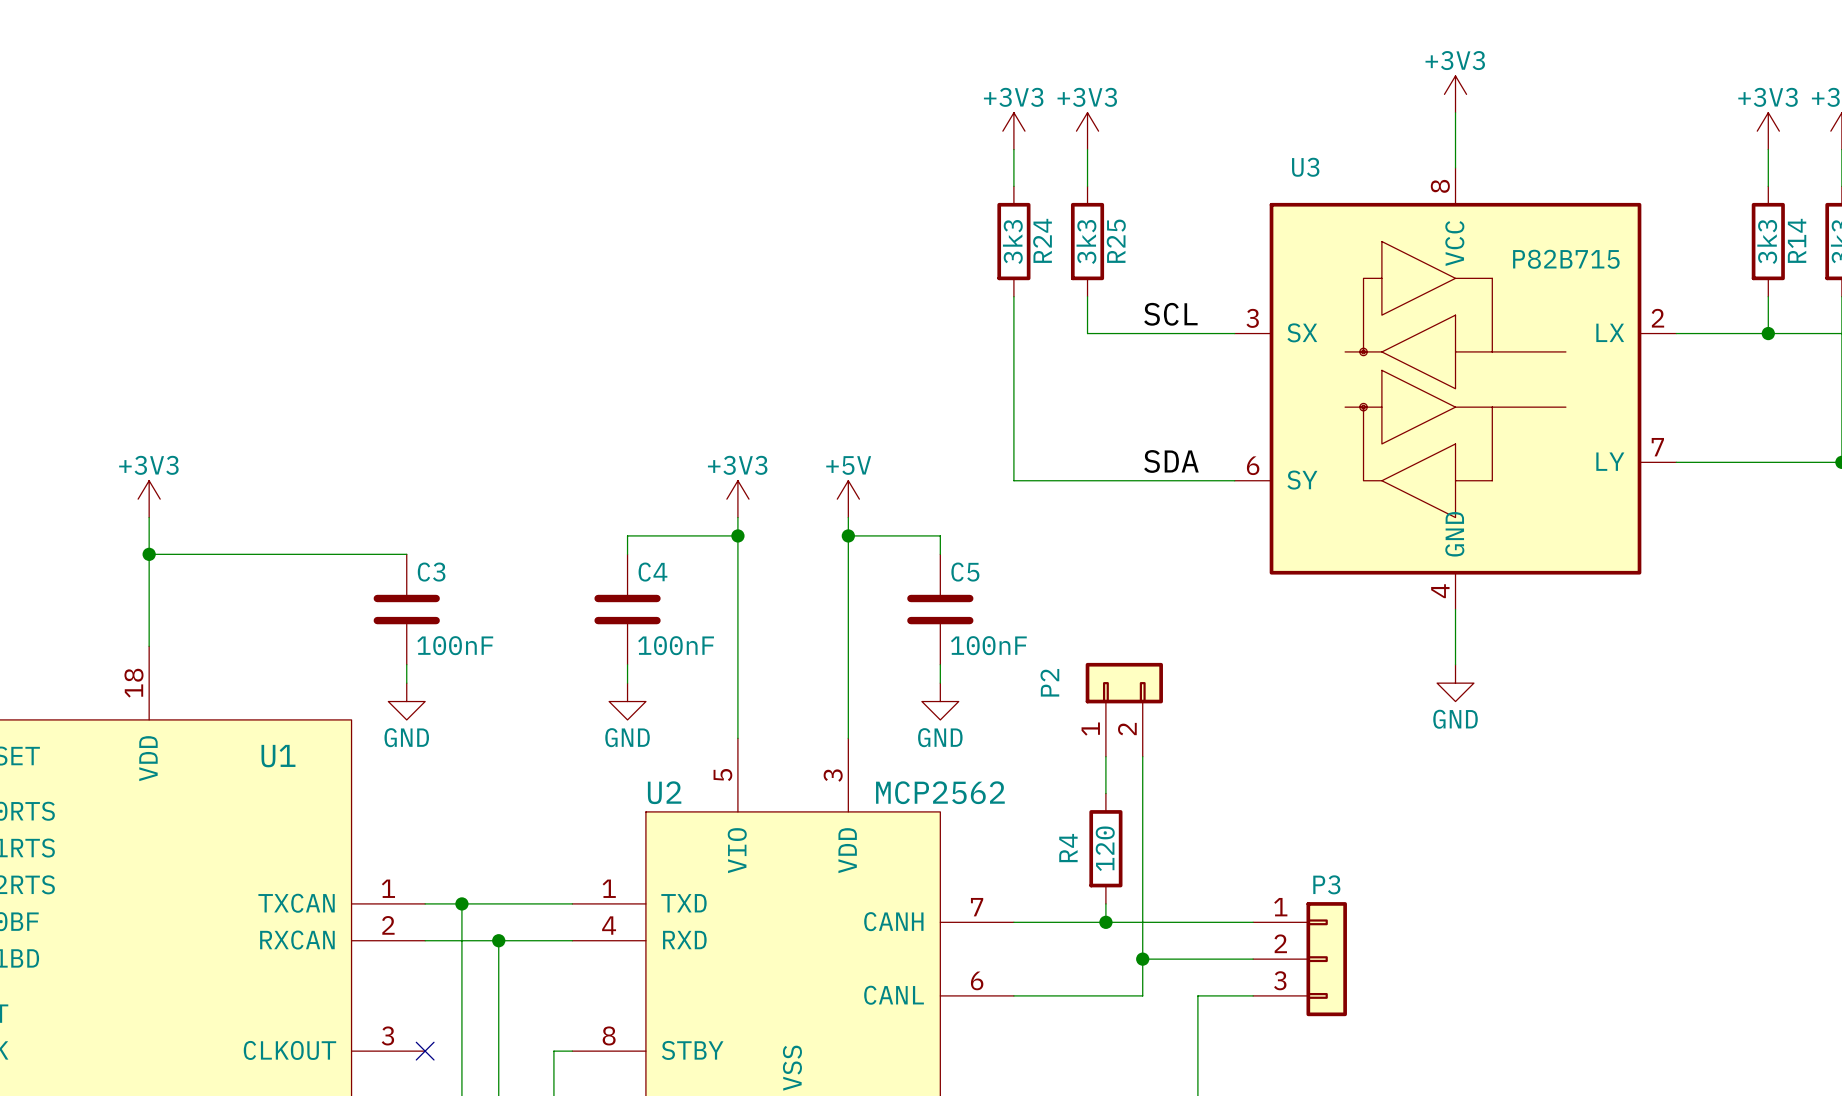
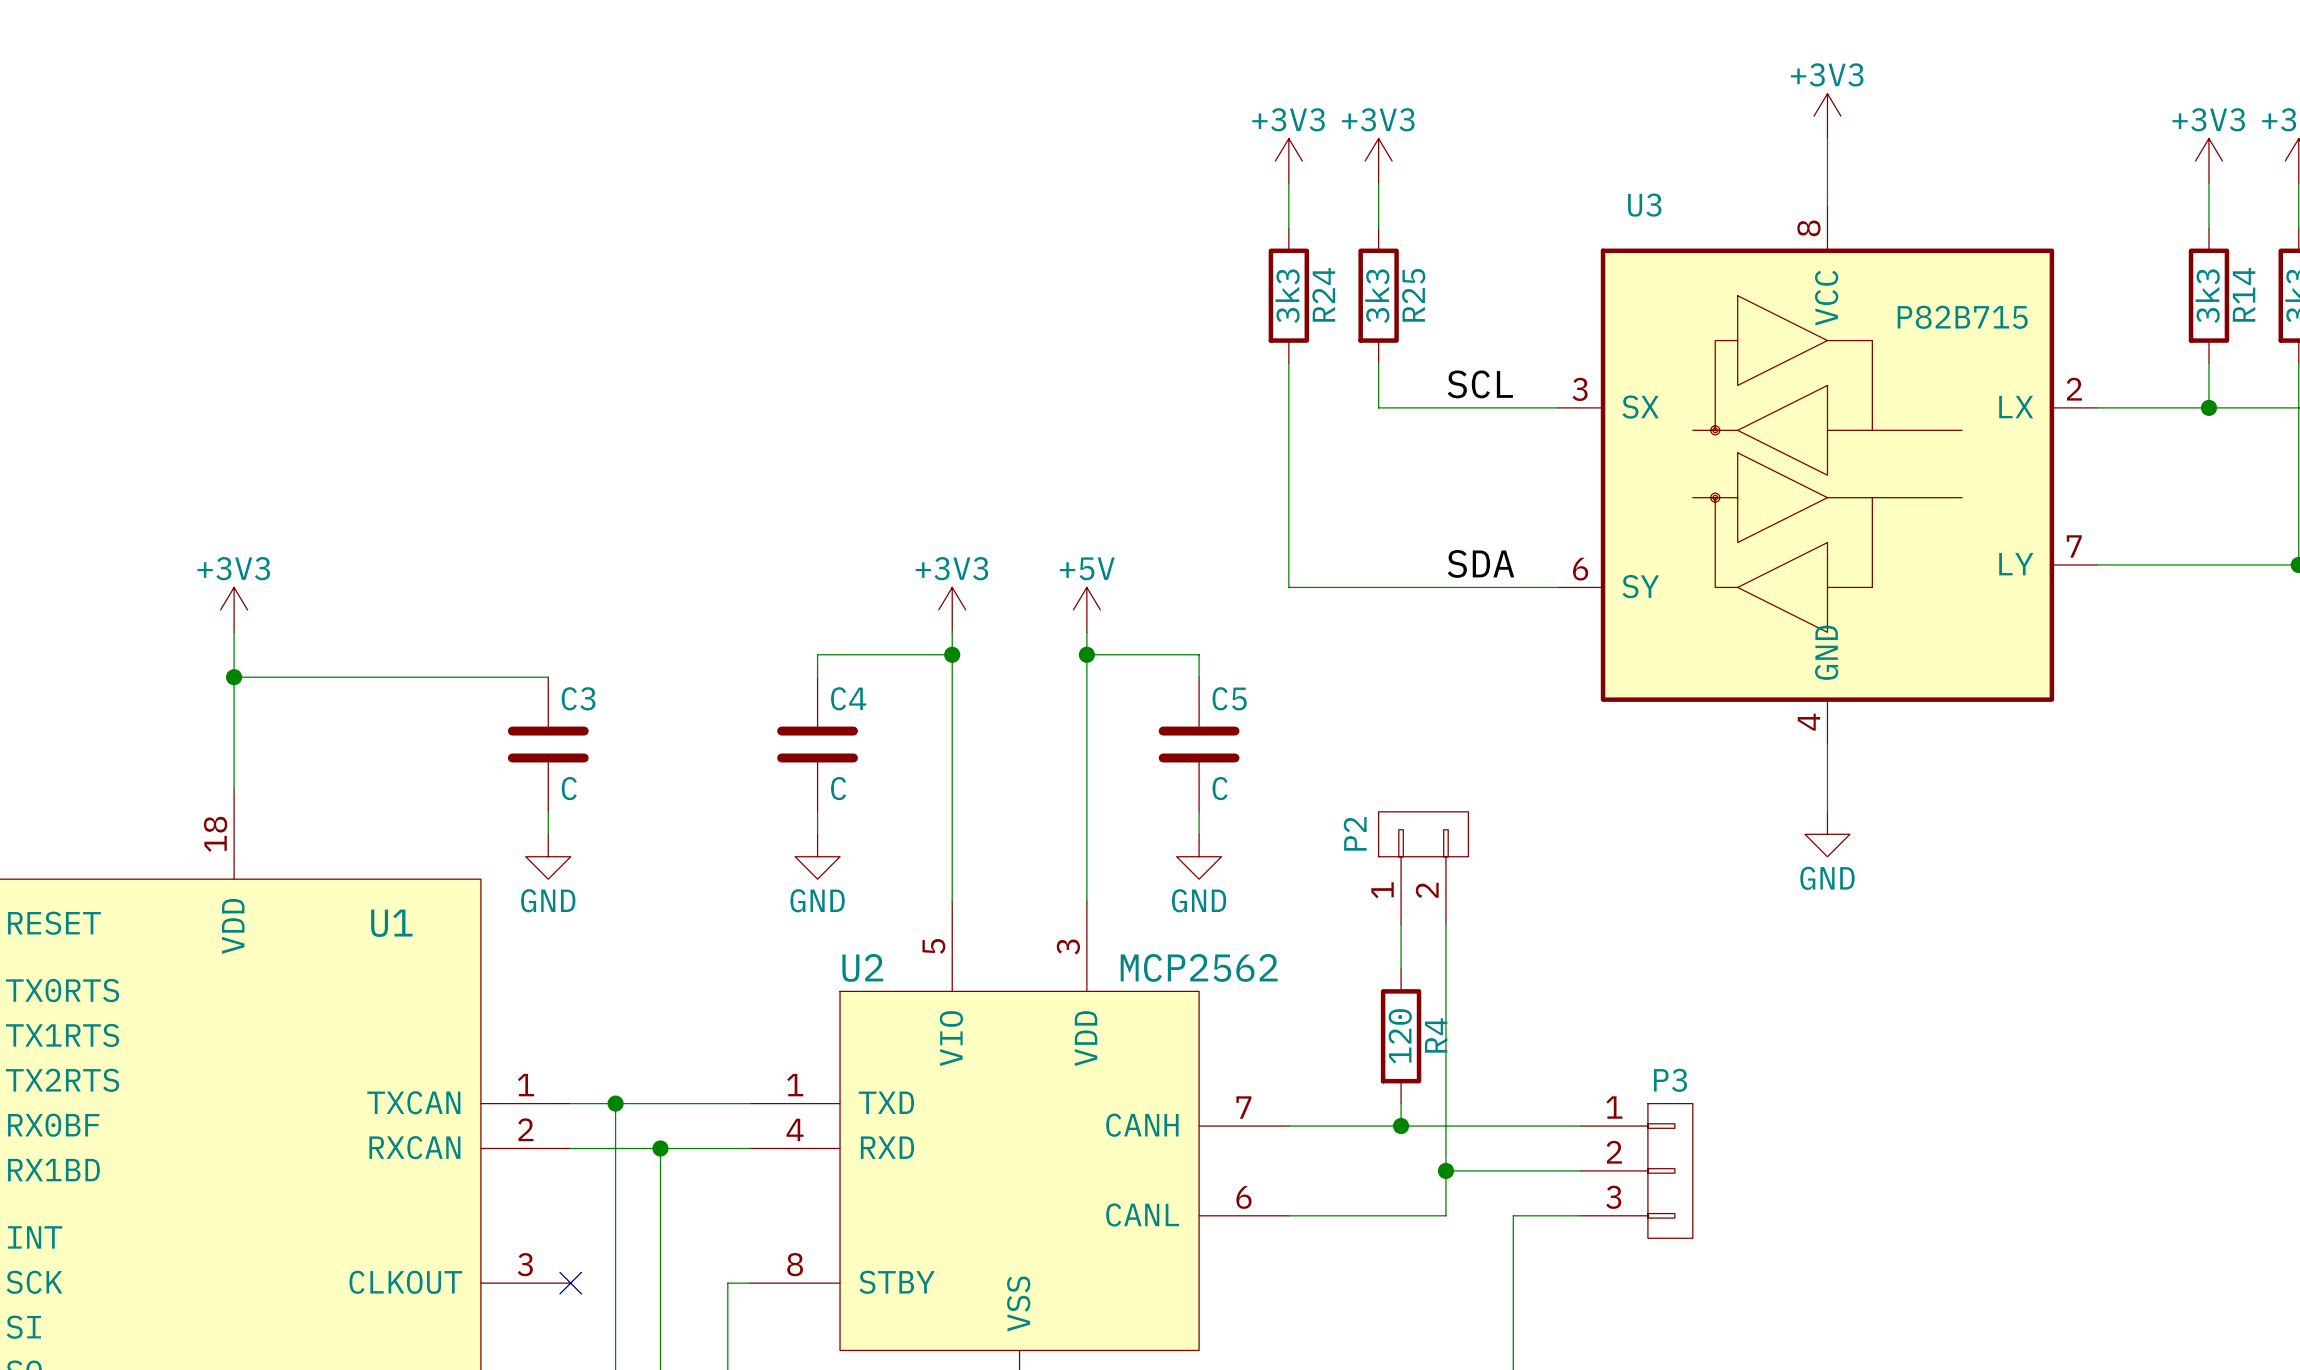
C3 value: 100nF (455, 645) -> C (569, 788)
C4 value: 100nF (676, 645) -> C (838, 788)
C5 value: 100nF (988, 645) -> C (1220, 788)
P2 symbol: [1085, 662, 1163, 757] -> [1378, 811, 1469, 925]
R4 name position: R4 (1068, 848) -> R4 (1436, 1035)
P3 symbol: [1253, 902, 1347, 1017] -> [1580, 1103, 1693, 1239]

